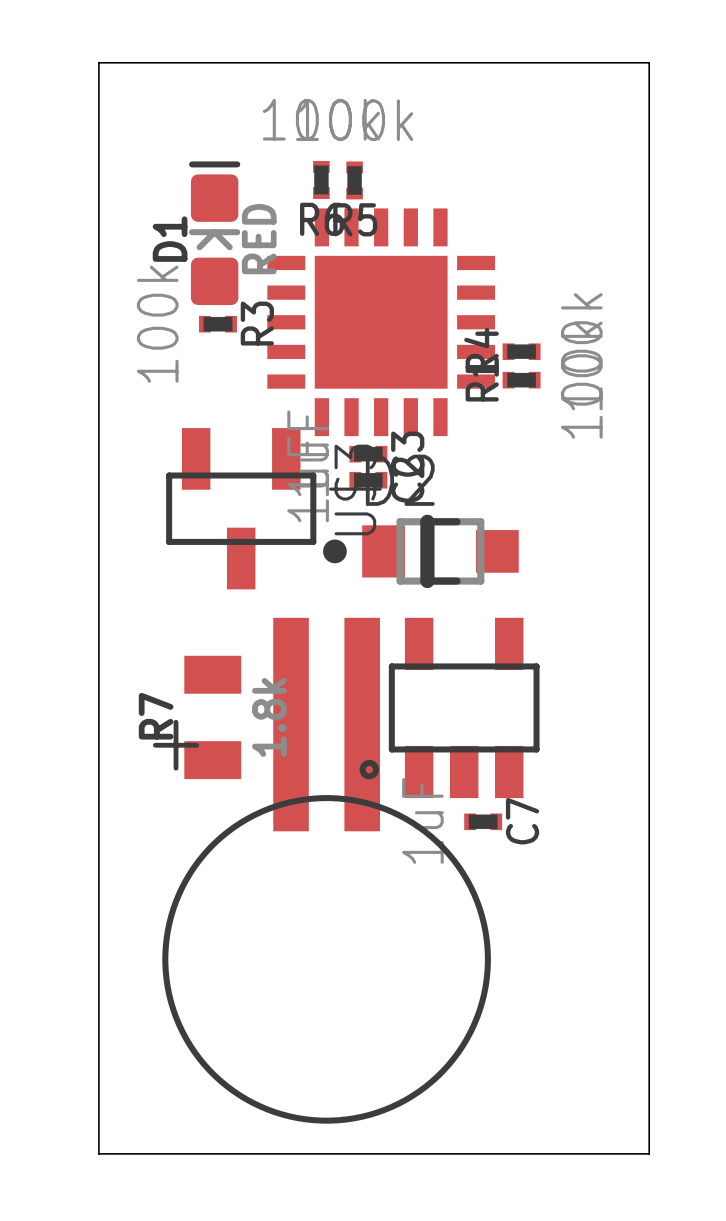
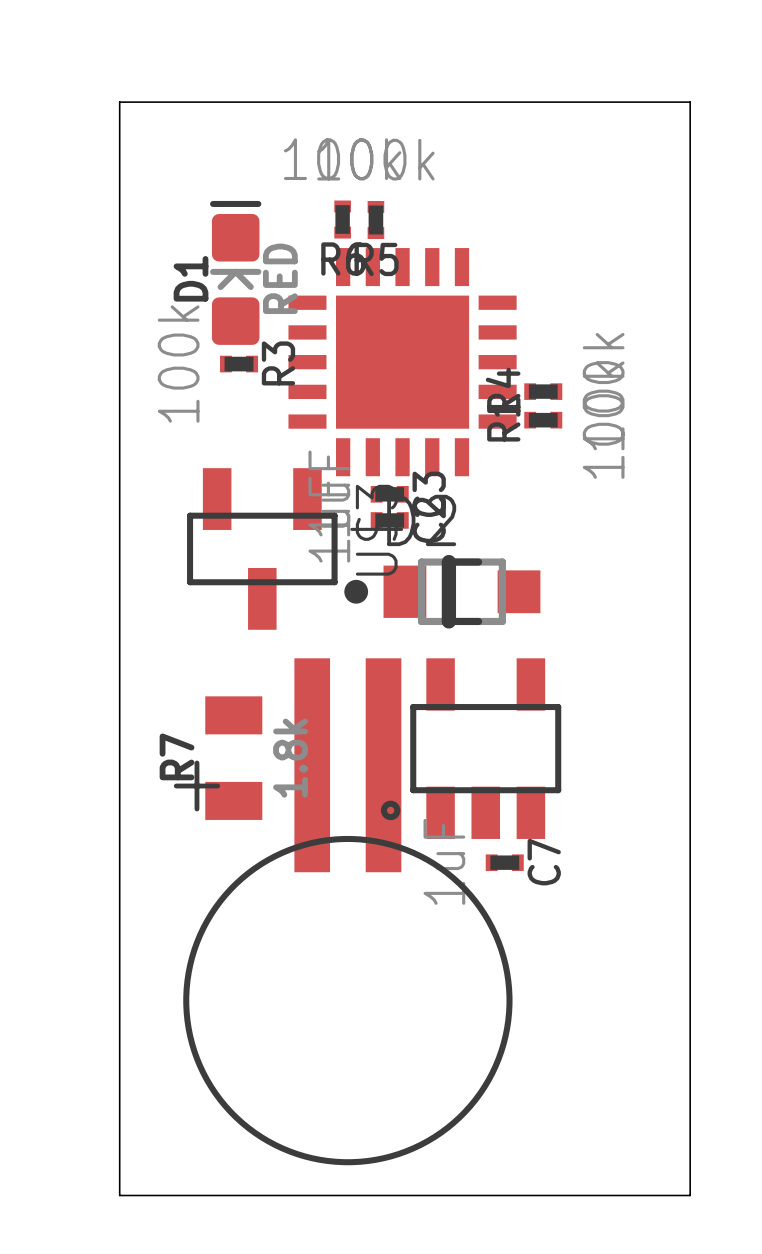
board edge: (649, 62) (649, 1153) -> (671, 102) (690, 102) (690, 1195) (671, 1195)

